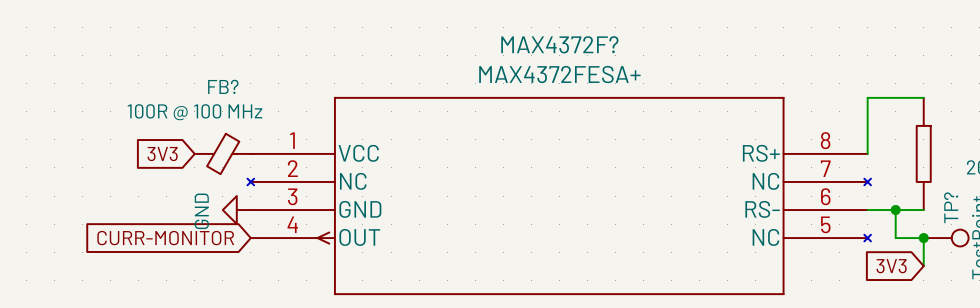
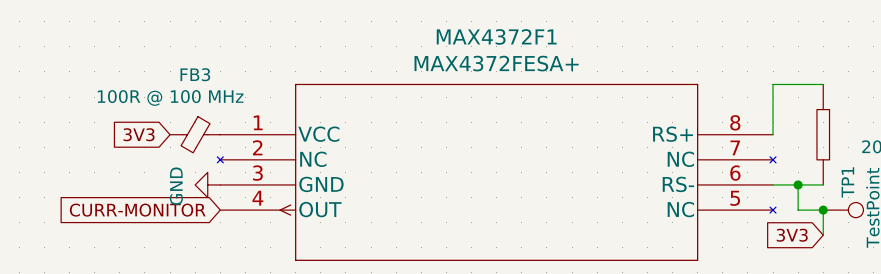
MAX4372F? name: MAX4372F? (559, 44) -> MAX4372F1 (496, 36)
FB? name: FB? (223, 86) -> FB3 (195, 74)
TP? name: TP? (951, 207) -> TP1 (847, 182)

